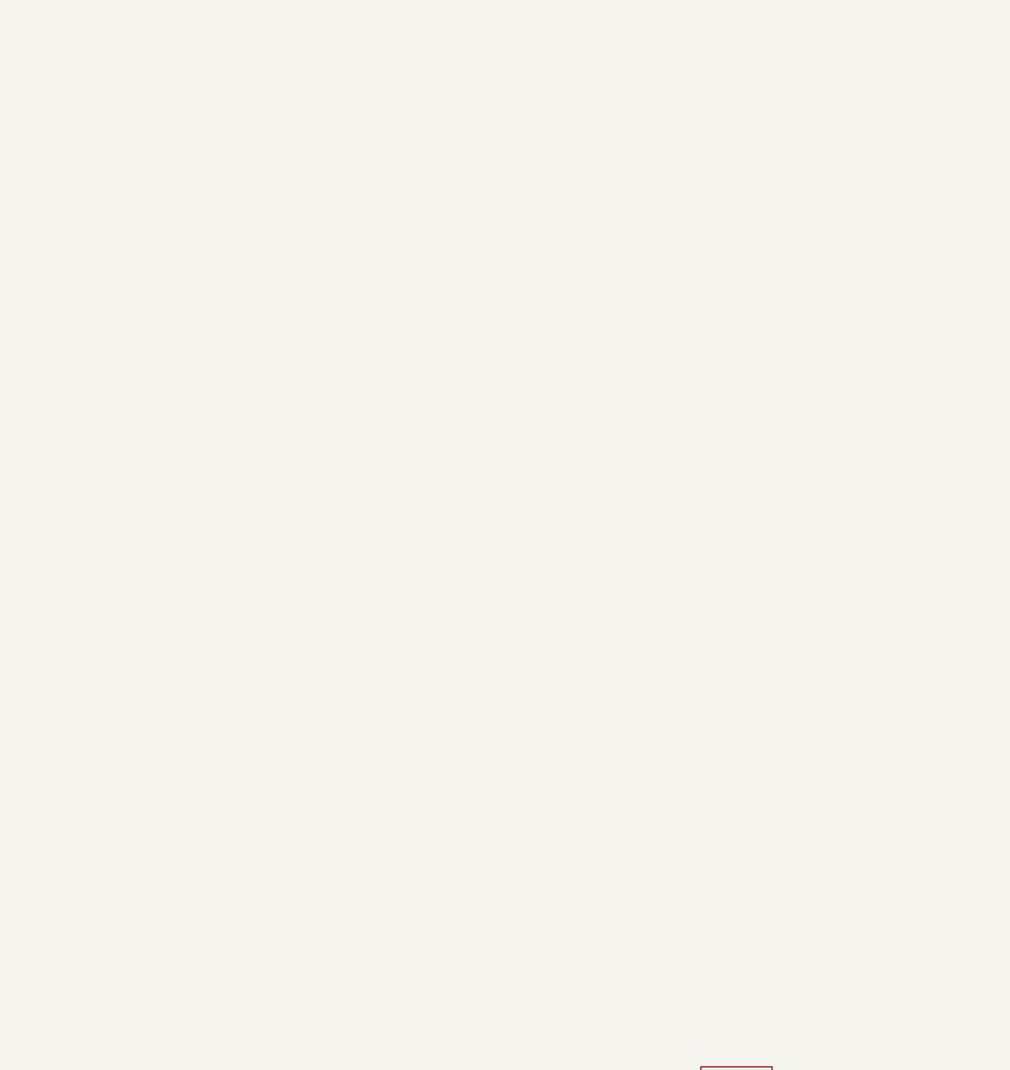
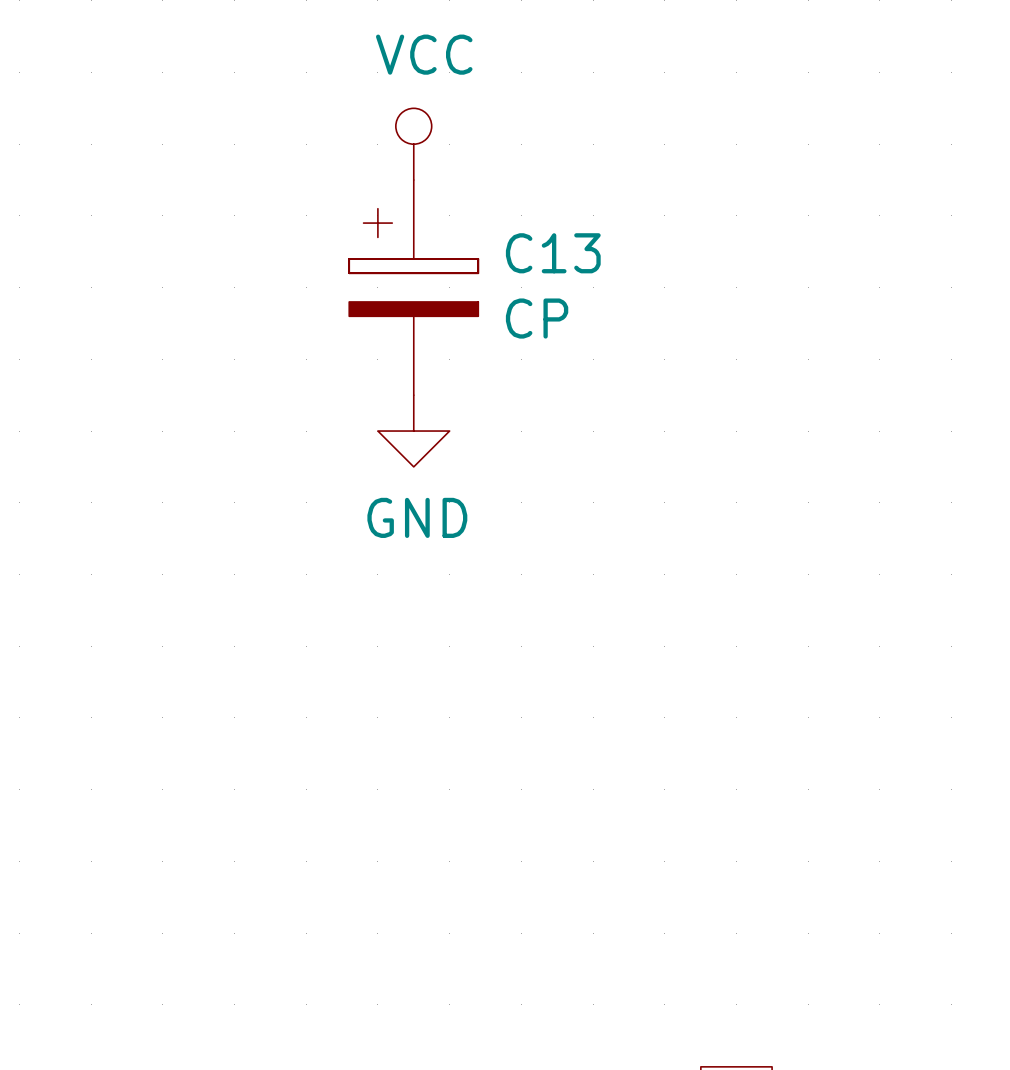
power symbol: none -> VCC (413, 144)
C13: none -> CP (413, 287)
power symbol: none -> GND (413, 431)

